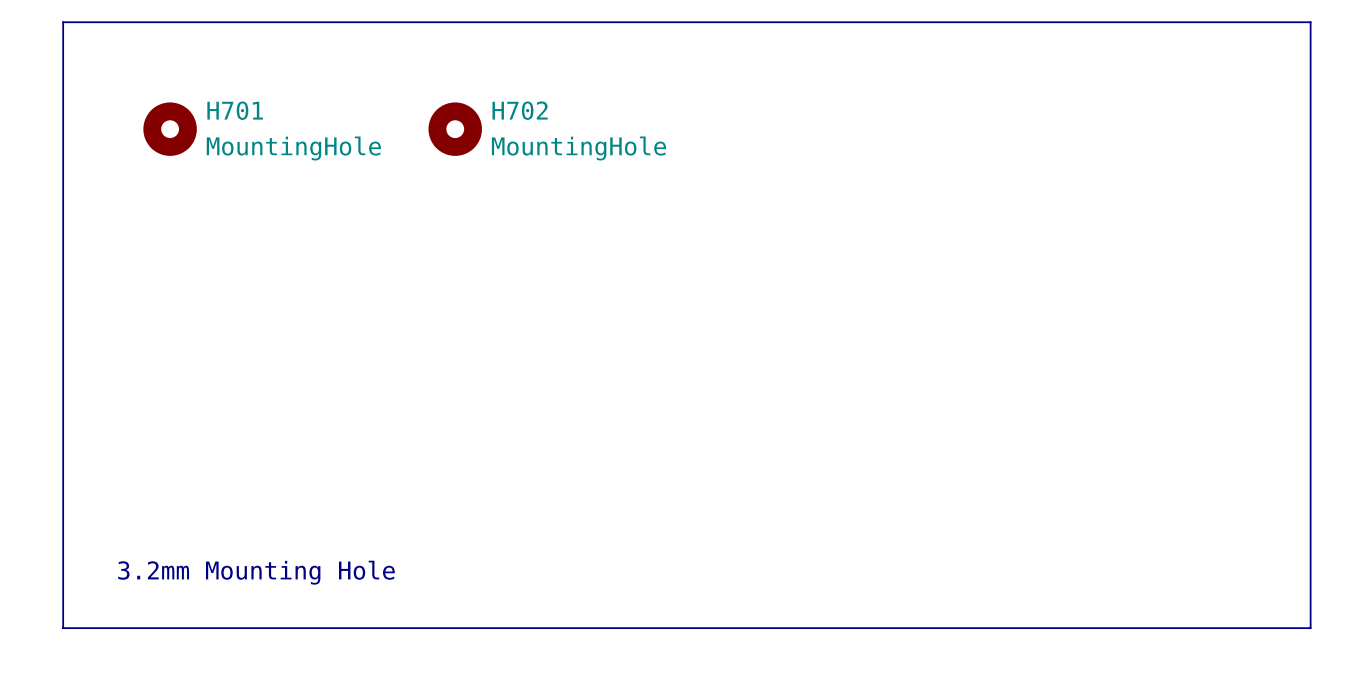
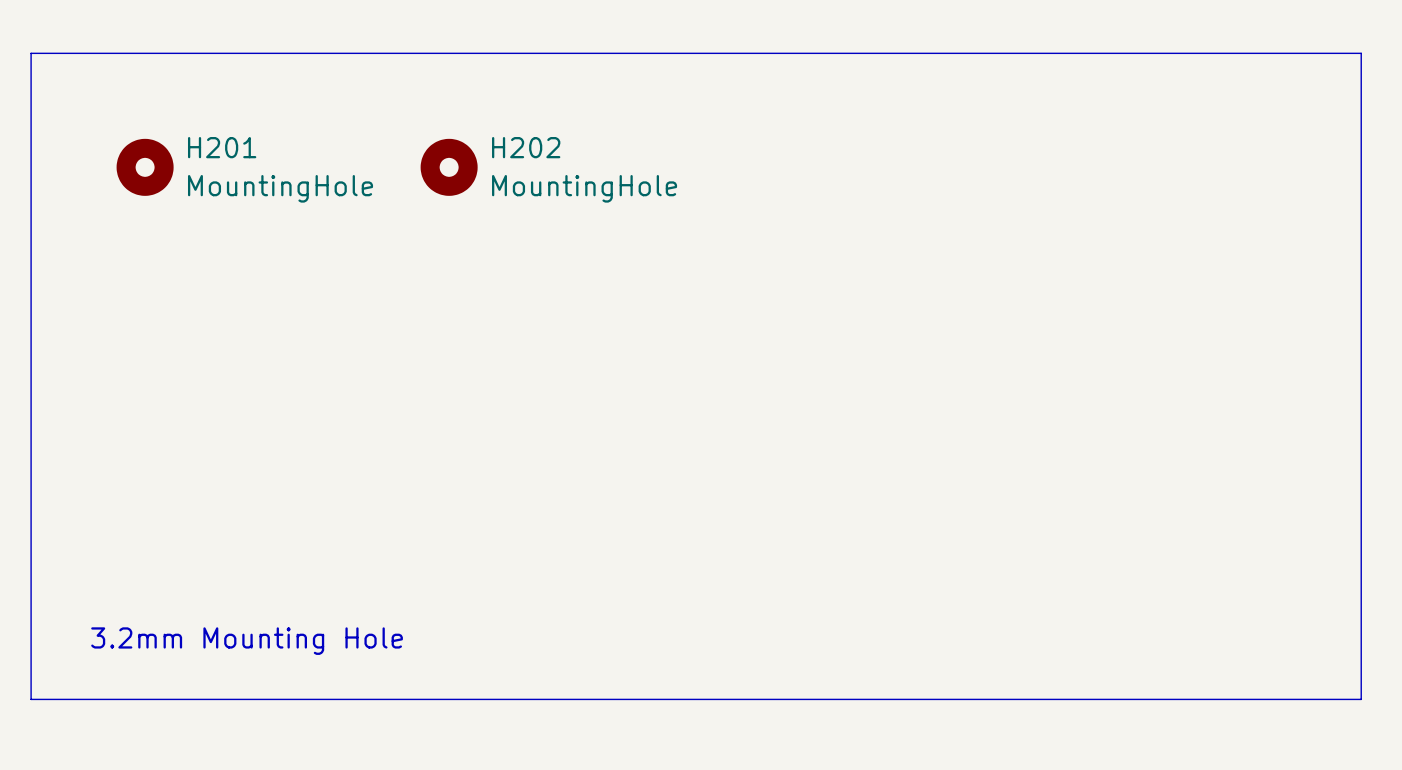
H701 name: H701 (235, 110) -> H201 (222, 147)
H702 name: H702 (520, 110) -> H202 (526, 147)

